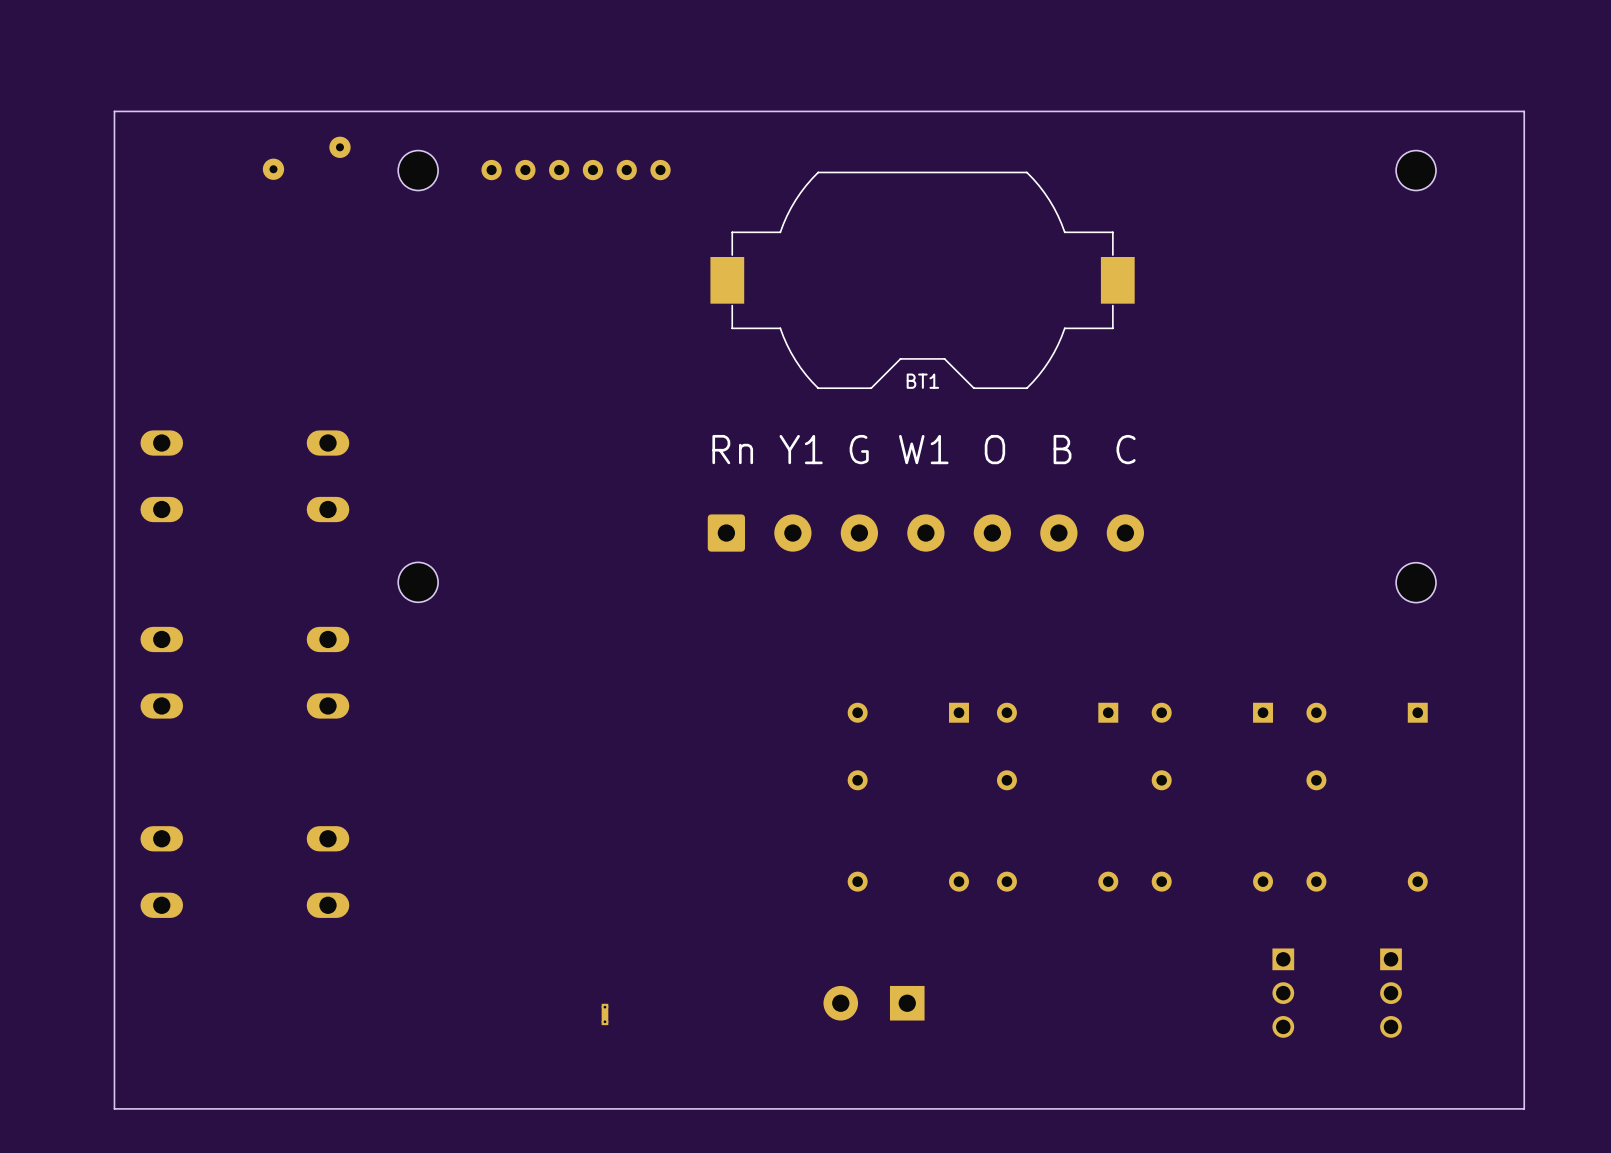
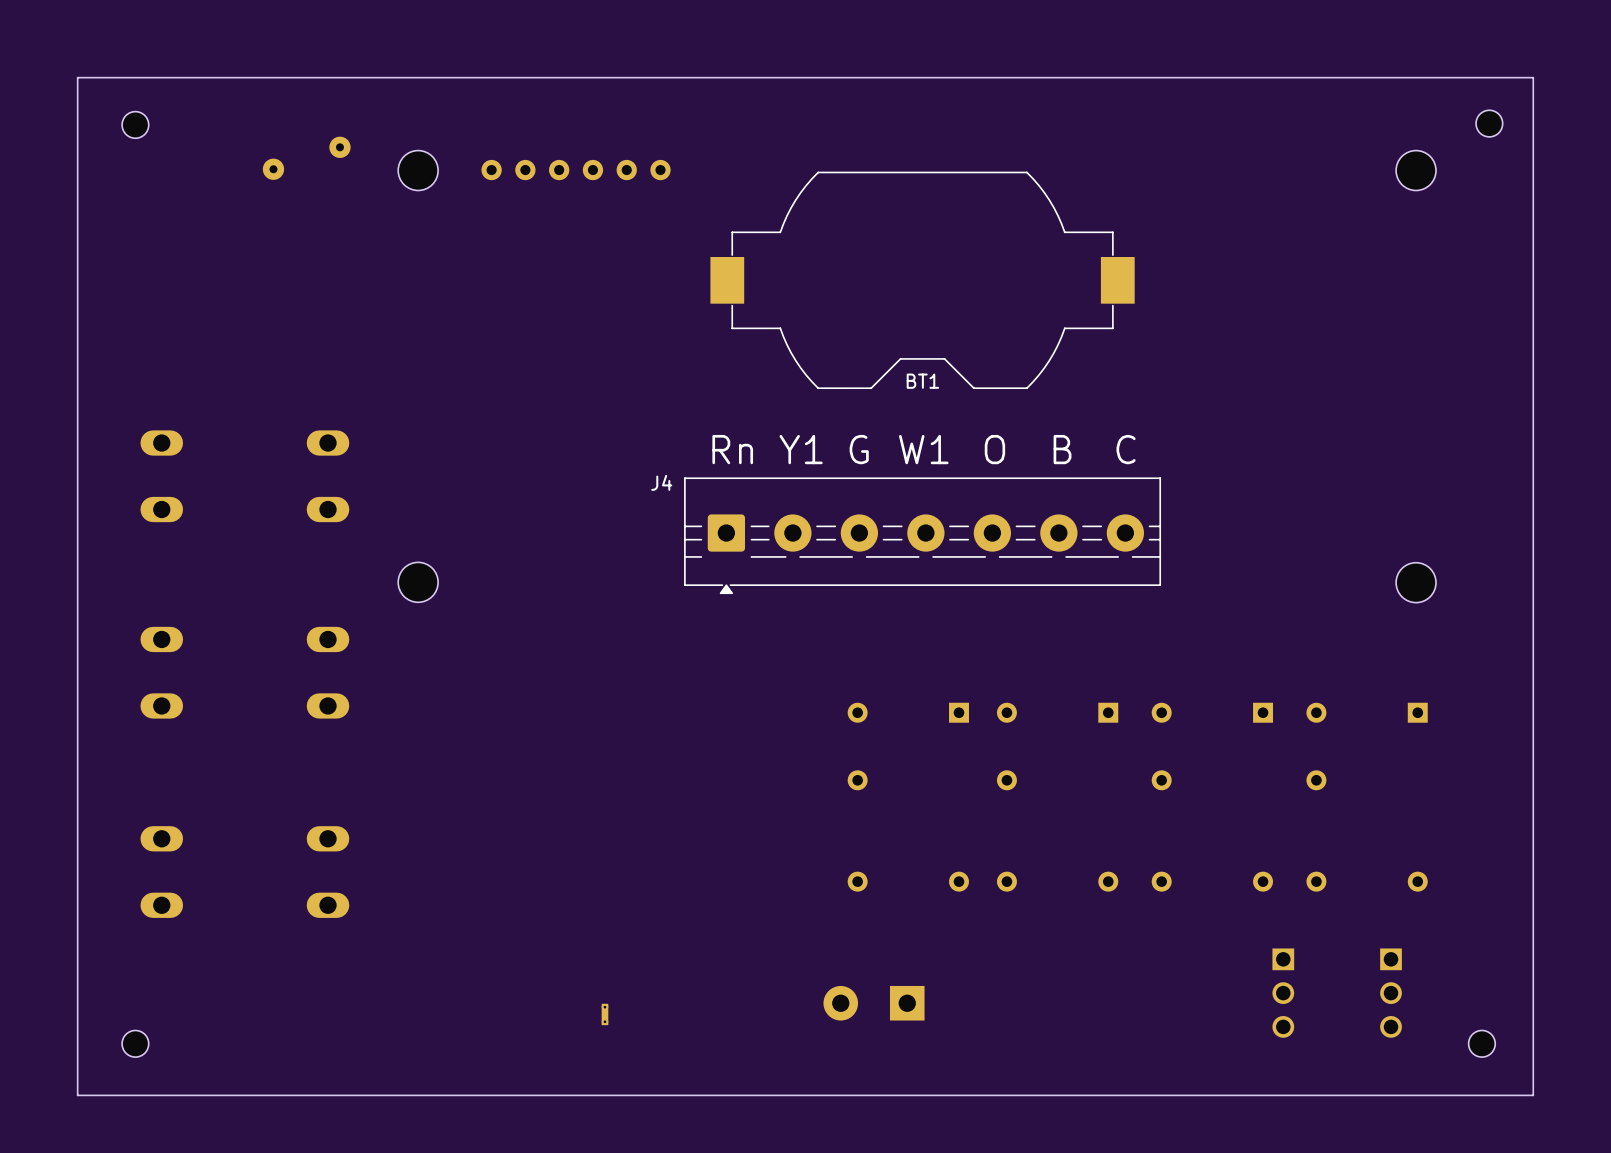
board edge: (1524, 111) (114, 111) (114, 1108) (1524, 1108) (1524, 111) -> (1533, 77) (1533, 1095) (77, 1095) (77, 77) (1533, 77)
part: none -> (1489, 123)
part: none -> (135, 124)
J4 side: top (925, 533) -> bottom (922, 535)
part: none -> (135, 1043)
part: none -> (1481, 1043)

